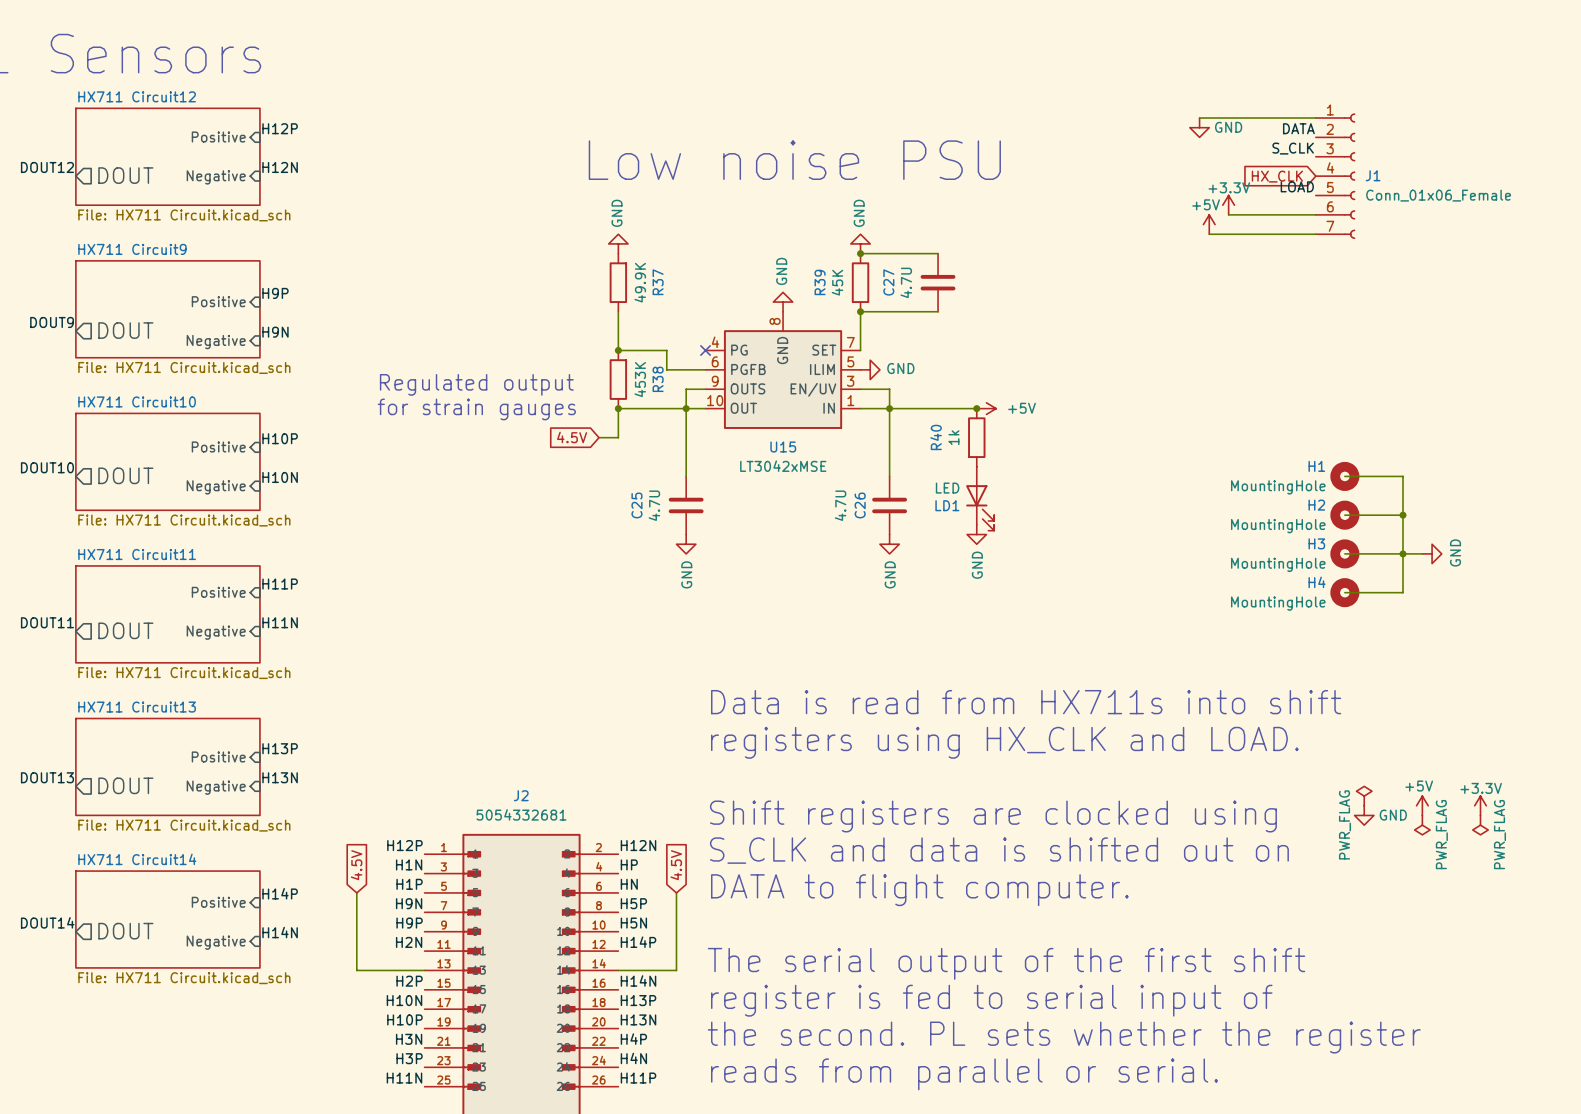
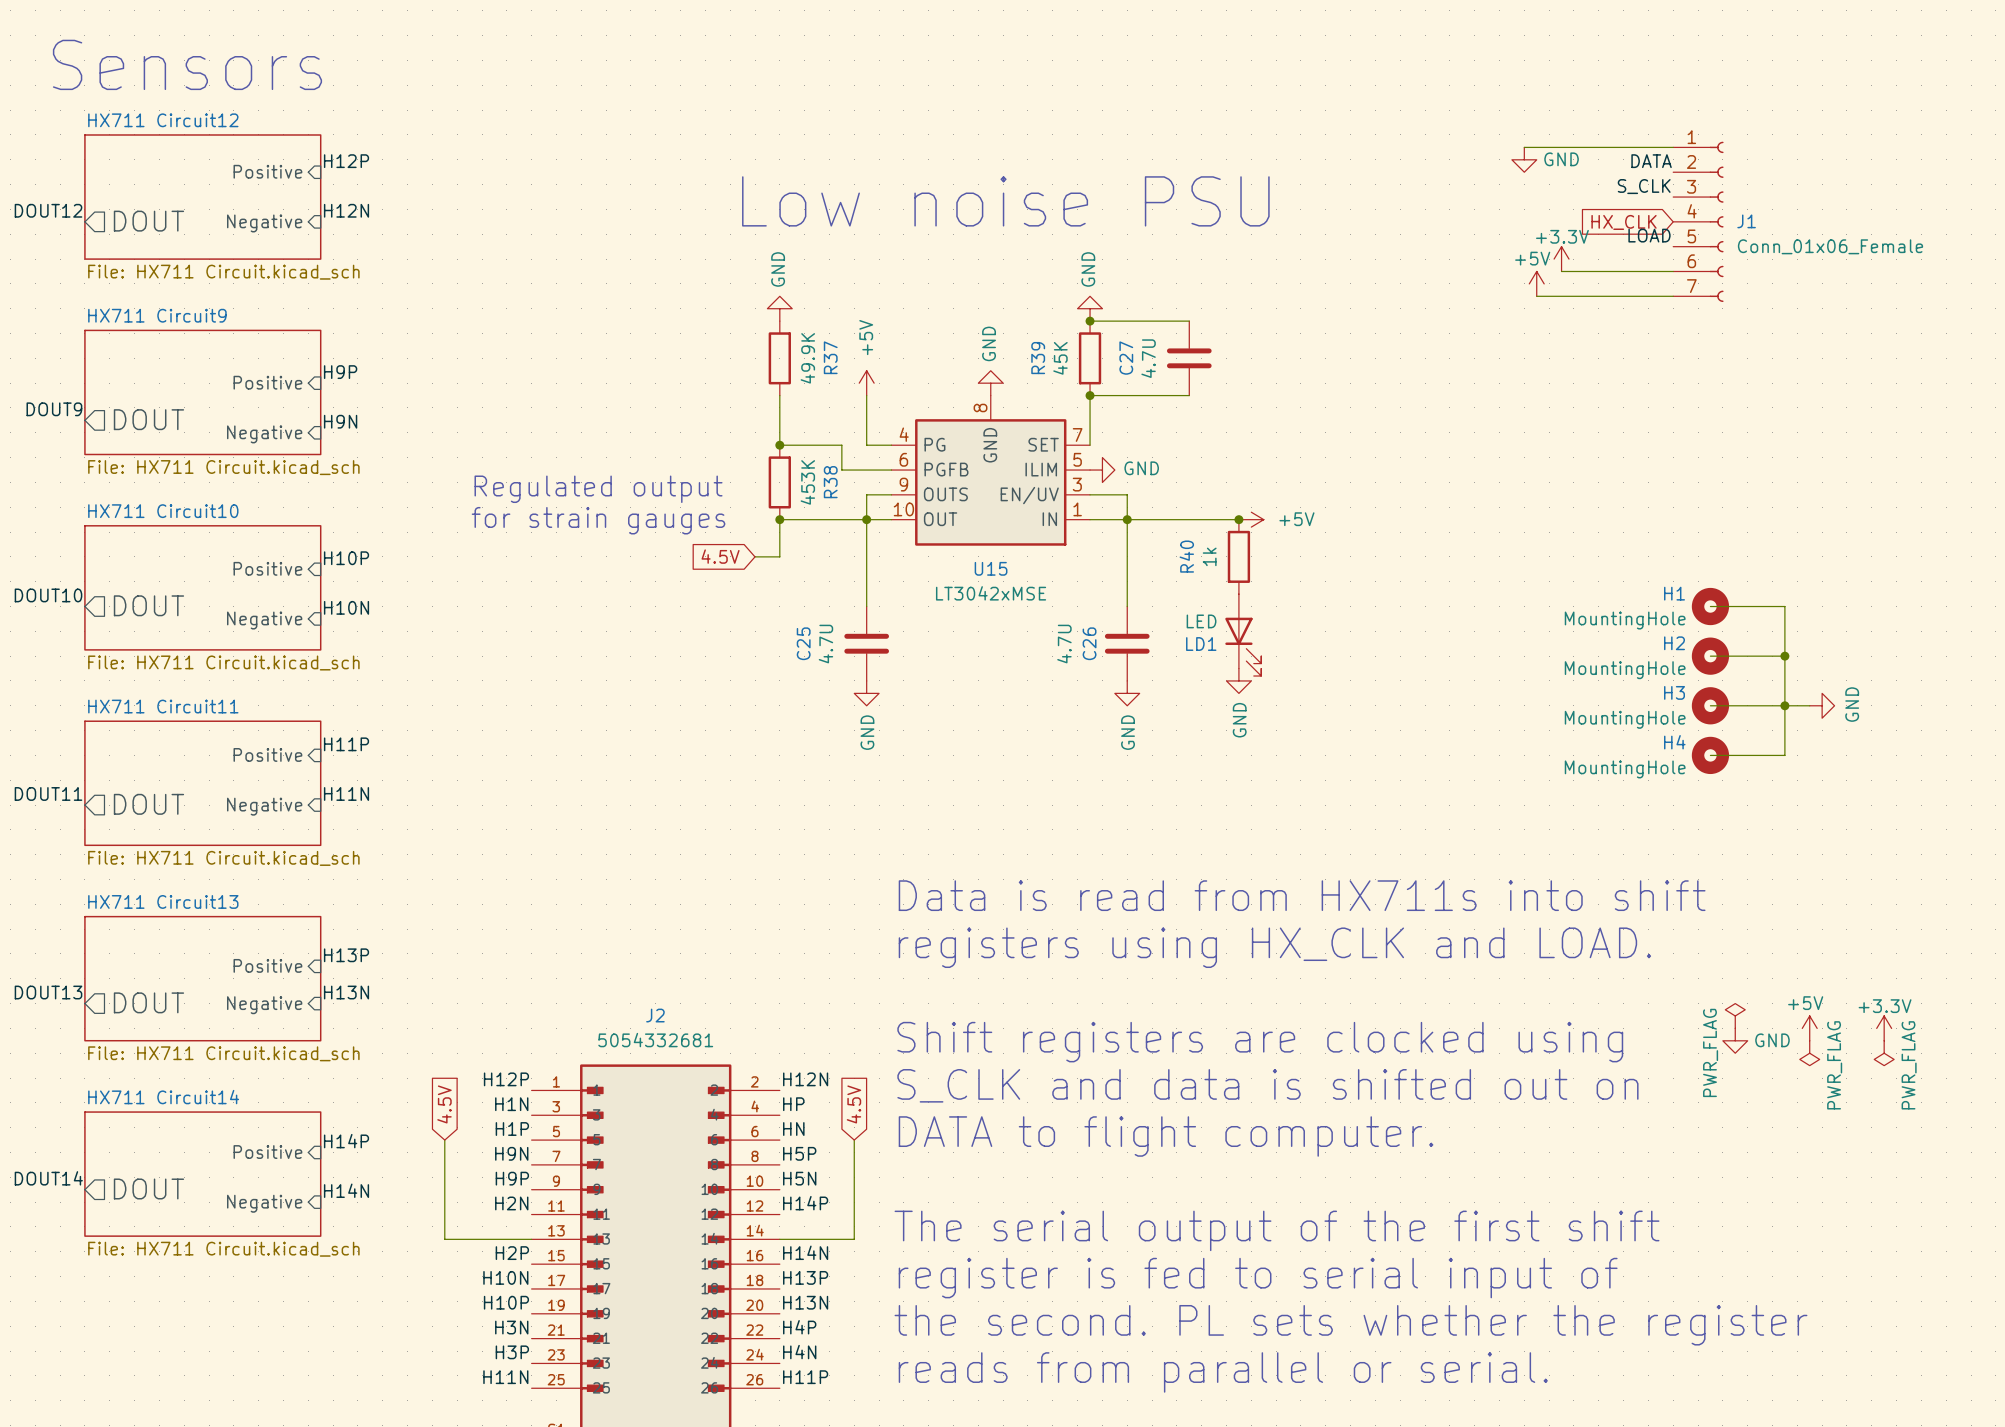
power symbol: none -> +5V (866, 383)
wire: none -> (866, 395) (866, 445) (891, 445)
no-connect mark: (705, 350) -> none

